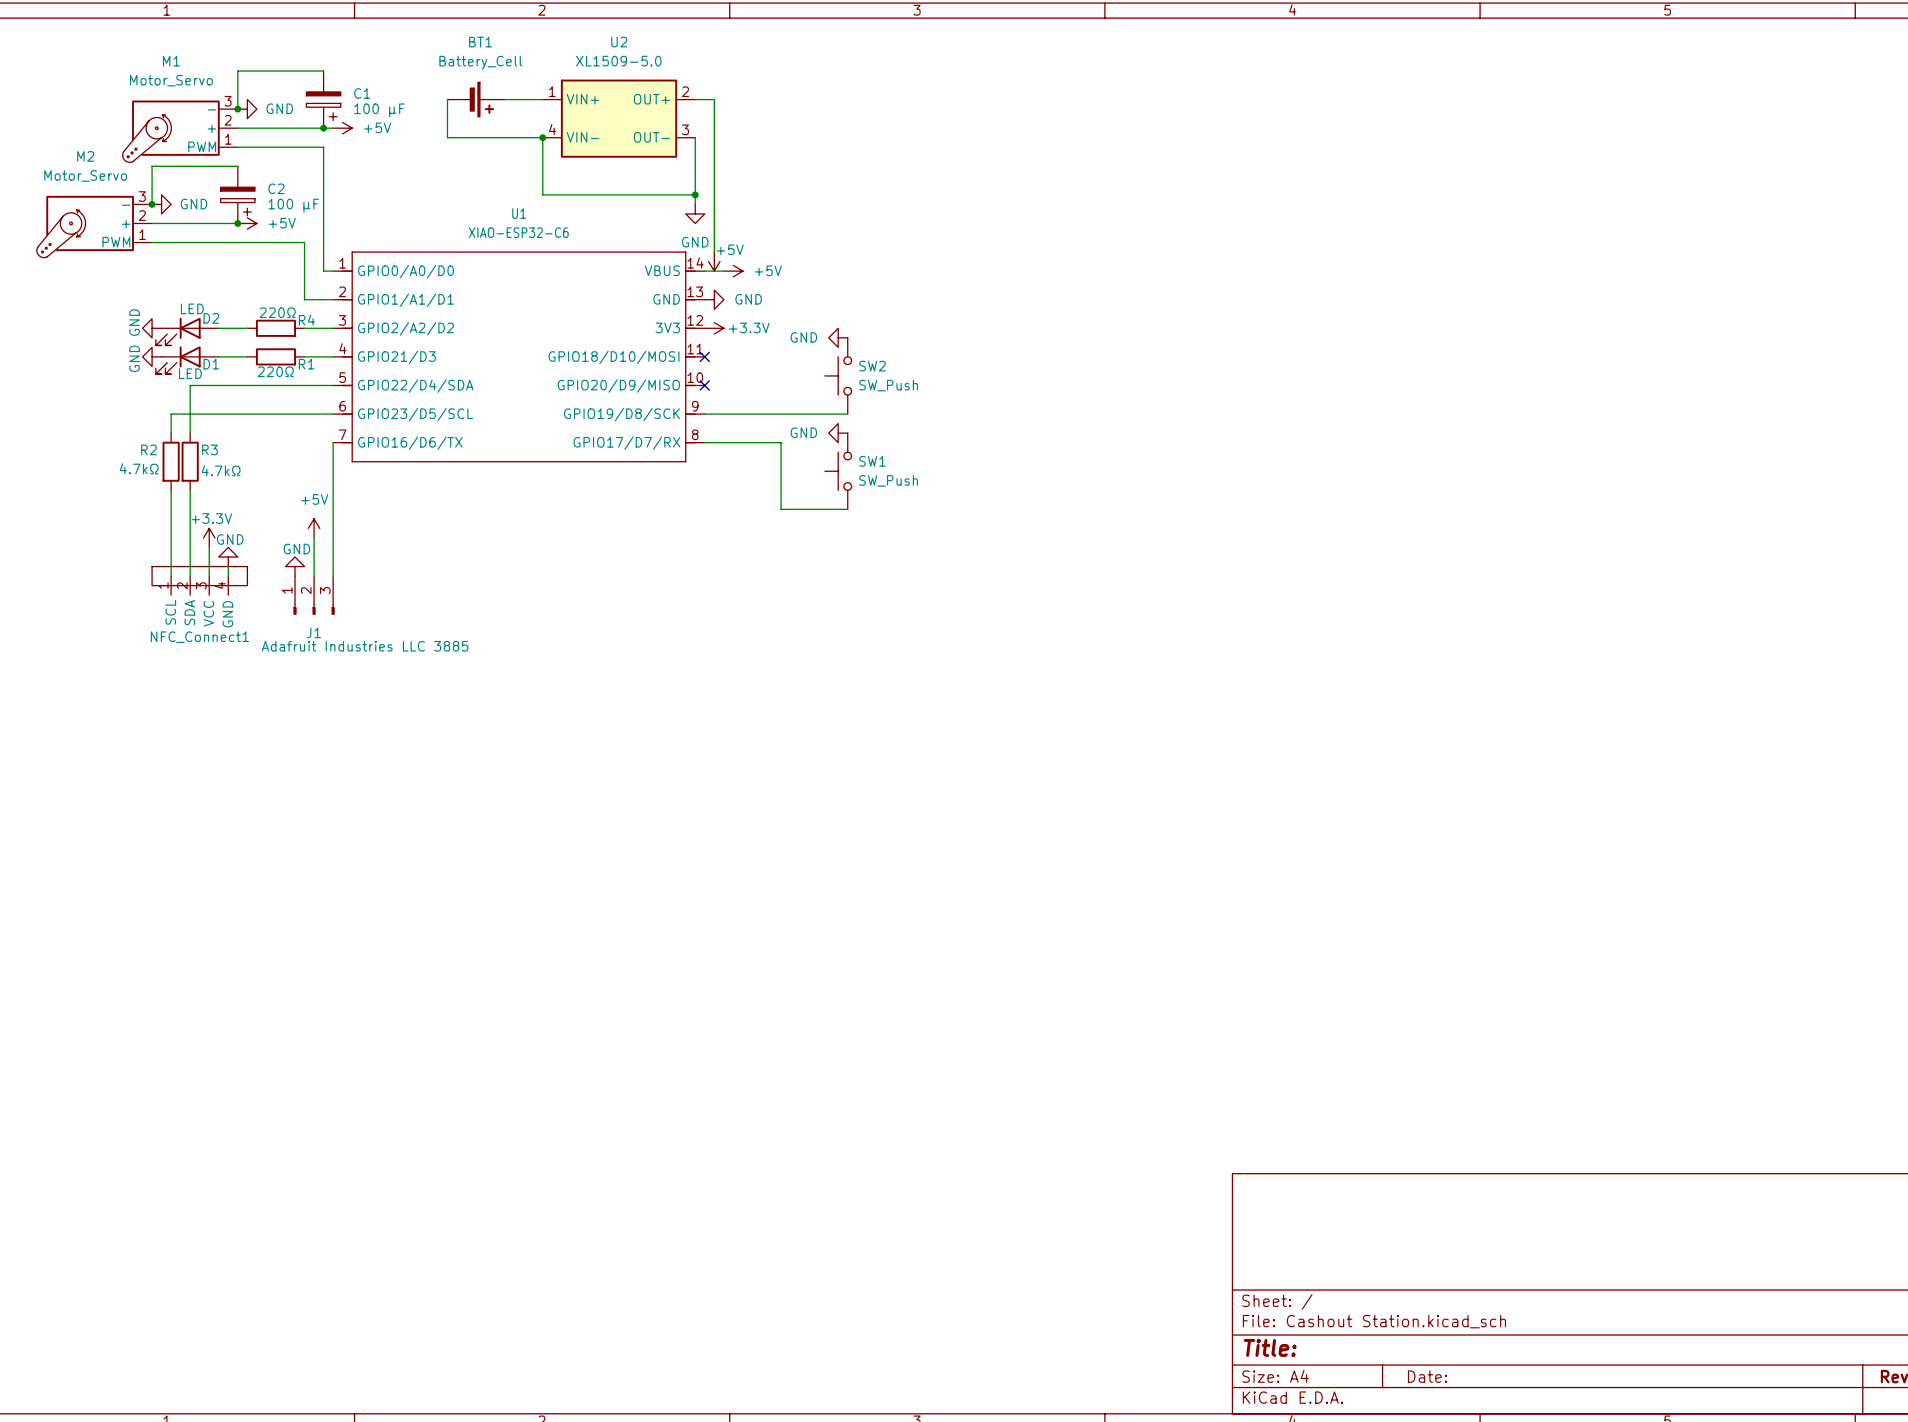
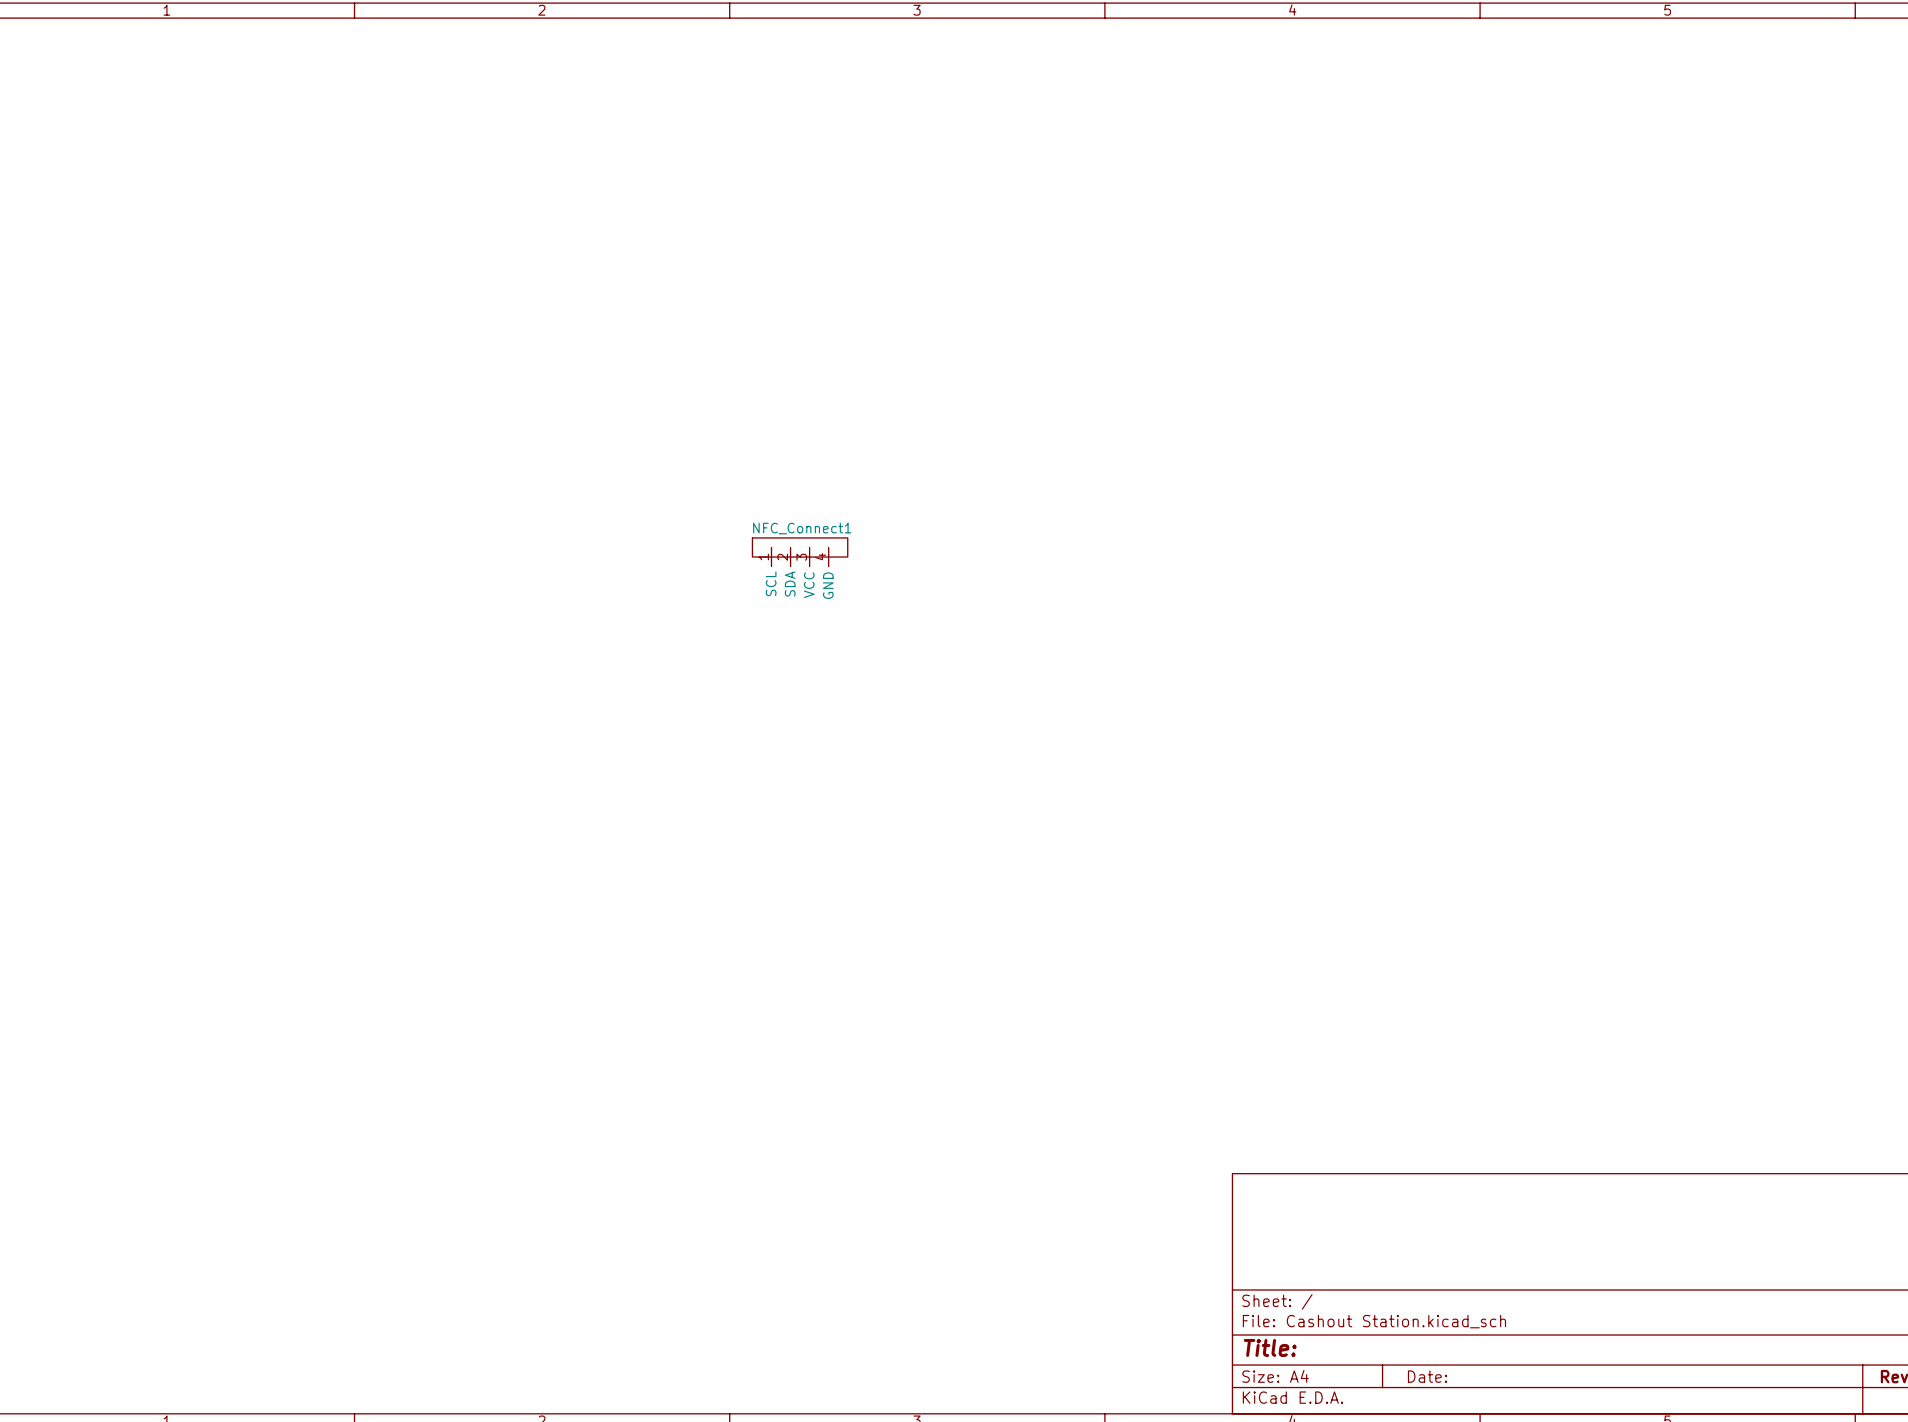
wire: (323, 71) (237, 71) (237, 109) -> none
C1: 100 µF (323, 99) -> none
wire: (447, 99) (447, 137) (542, 137) (542, 194) (695, 194) -> none
BT1: Battery_Cell (476, 99) -> none
wire: (504, 99) (542, 99) -> none
wire: (695, 99) (714, 99) (714, 252) -> none
junction: (237, 109) -> none
power symbol: GND (247, 109) -> none
U2: XL1509-5.0 (619, 118) -> none
wire: (237, 128) (333, 128) -> none
junction: (323, 128) -> none
power symbol: +5V (342, 128) -> none
M1: Motor_Servo (180, 131) -> none
junction: (542, 137) -> none
wire: (695, 137) (695, 204) -> none
wire: (237, 147) (323, 147) (323, 271) (333, 271) -> none
wire: (237, 166) (152, 166) (152, 204) -> none
C2: 100 µF (237, 194) -> none
junction: (695, 194) -> none
junction: (152, 204) -> none
power symbol: GND (161, 204) -> none
power symbol: GND (695, 213) -> none
wire: (152, 223) (237, 223) -> none
junction: (237, 223) -> none
power symbol: +5V (247, 223) -> none
M2: Motor_Servo (94, 226) -> none
wire: (152, 242) (304, 242) (304, 299) (333, 299) -> none
power symbol: +5V (714, 261) -> none
wire: (704, 271) (723, 271) -> none
power symbol: +5V (733, 271) -> none
power symbol: GND (714, 299) -> none
power symbol: GND (152, 328) -> none
wire: (218, 328) (247, 328) -> none
R4: 220Ω (275, 328) -> none
wire: (304, 328) (333, 328) -> none
power symbol: +3.3V (714, 328) -> none
D2: LED (187, 331) -> none
power symbol: GND (838, 337) -> none
power symbol: GND (152, 356) -> none
wire: (218, 356) (247, 356) -> none
R1: 220Ω (275, 356) -> none
wire: (304, 356) (333, 356) -> none
U1: XIAO-ESP32-C6 (518, 356) -> none
no-connect mark: (704, 356) -> none
D1: LED (187, 360) -> none
SW2: SW_Push (838, 375) -> none
wire: (333, 385) (190, 385) (190, 433) -> none
no-connect mark: (704, 385) -> none
wire: (333, 414) (171, 414) (171, 433) -> none
wire: (704, 414) (847, 414) -> none
power symbol: GND (838, 433) -> none
wire: (333, 442) (333, 576) -> none
wire: (704, 442) (781, 442) (781, 509) (847, 509) -> none
R2: 4.7kΩ (171, 461) -> none
R3: 4.7kΩ (190, 461) -> none
SW1: SW_Push (838, 471) -> none
wire: (171, 490) (171, 576) -> none
wire: (190, 490) (190, 576) -> none
power symbol: +5V (314, 528) -> none
power symbol: +3.3V (209, 537) -> none
wire: (314, 537) (314, 576) -> none
wire: (209, 547) (209, 576) -> none
power symbol: GND (228, 557) -> none
wire: (228, 566) (228, 576) -> none
power symbol: GND (295, 566) -> none
NFC_Connect1 position: (199, 580) -> (800, 552)
J1: Adafruit Industries LLC 3885 (314, 595) -> none
NFC_Connect1 name position: NFC_Connect1 (199, 637) -> NFC_Connect1 (802, 528)

